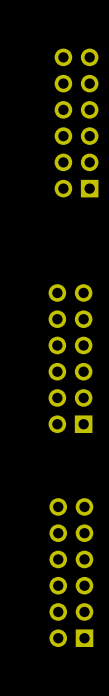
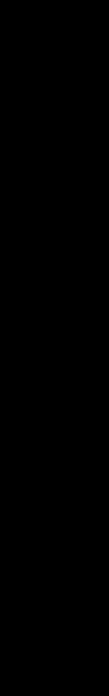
part: (76, 123) -> none
part: (70, 358) -> none
part: (71, 572) -> none

